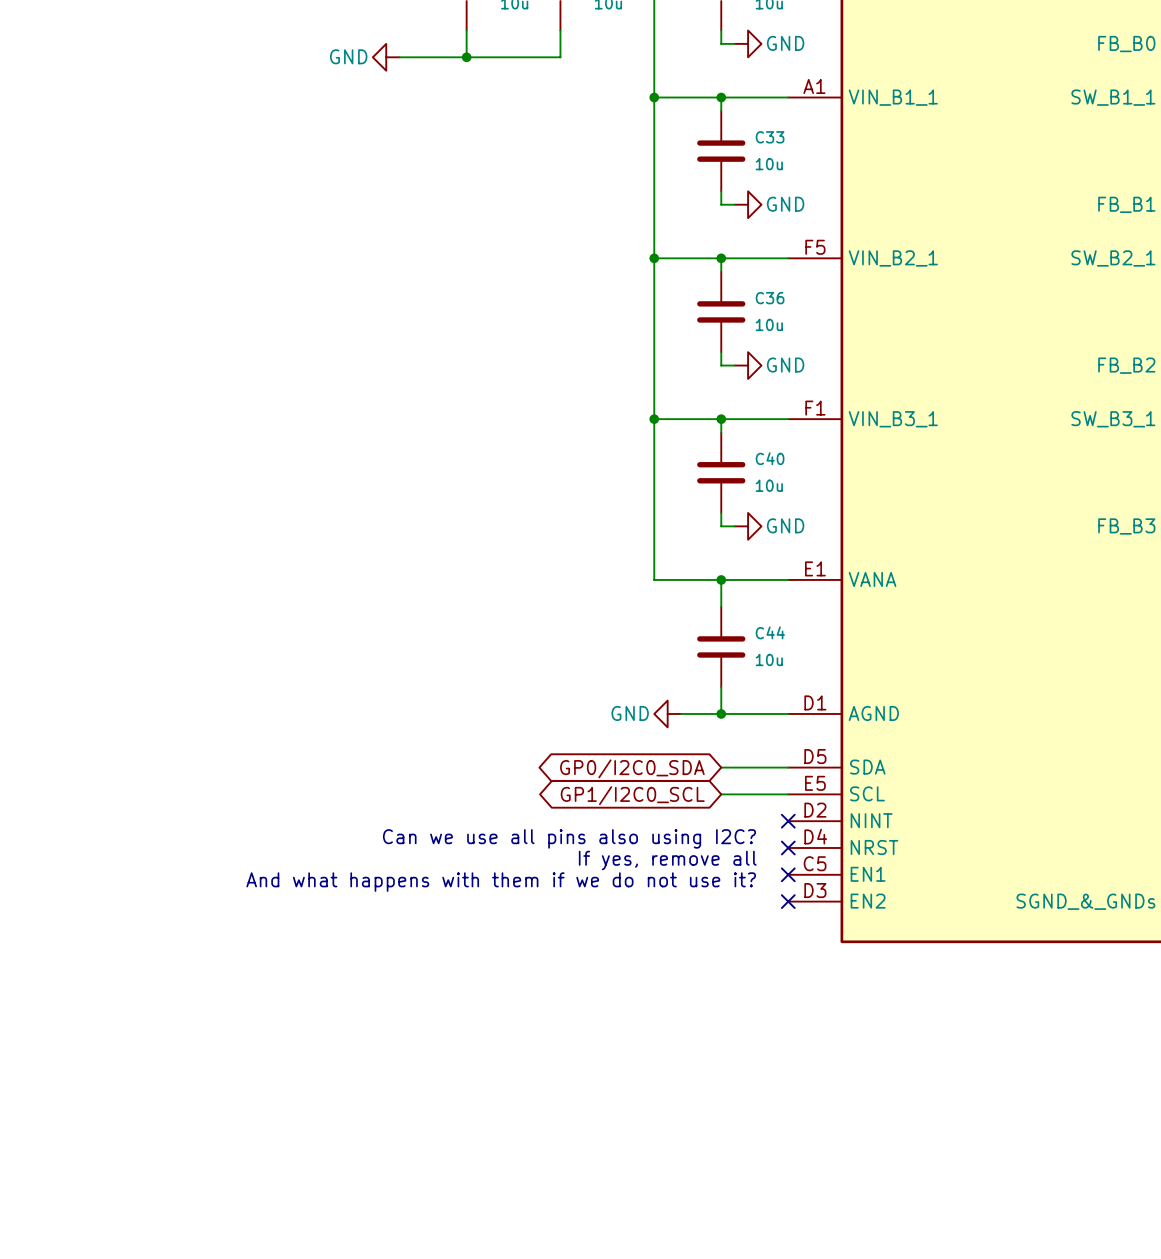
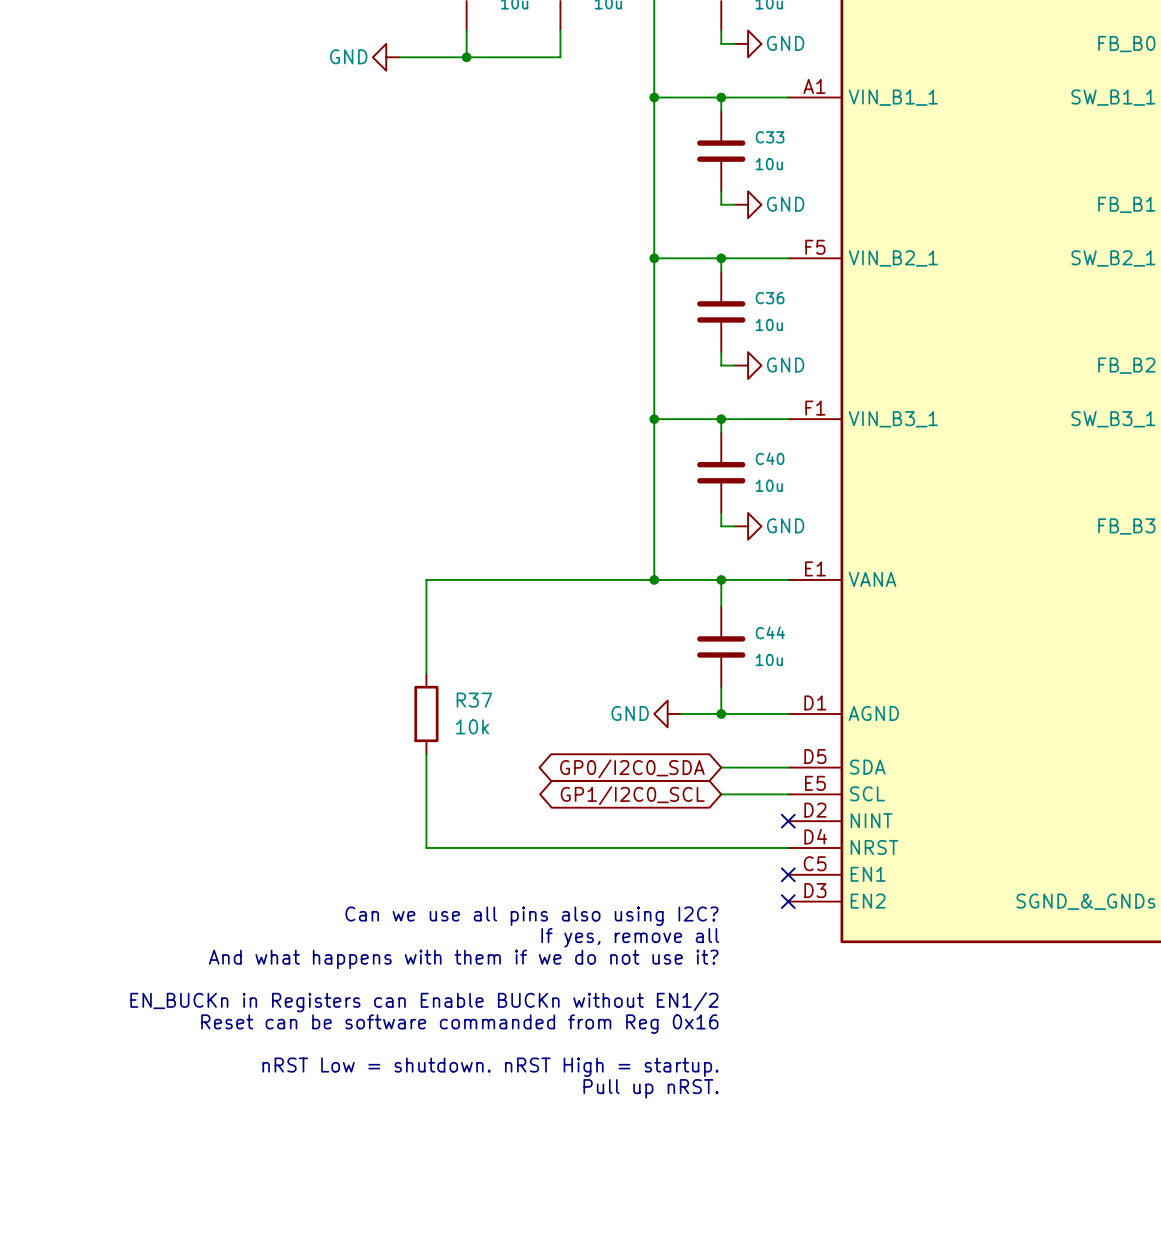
wire: none -> (654, 579) (426, 579) (426, 673)
junction: none -> (654, 579)
R37: none -> 10k (426, 713)
wire: none -> (426, 754) (426, 847) (788, 847)
text position: Can we use all pins also using I2C? (569, 838) -> Can we use all pins also using I2C? (531, 916)
no-connect mark: (788, 847) -> none
text position: If yes, remove all (667, 860) -> If yes, remove all (630, 937)
text position: And what happens with them if we do not use it? (501, 882) -> And what happens with them if we do not use it? (463, 959)
text: none -> EN_BUCKn in Registers can Enable BUCKn without EN1/2 (424, 1002)
text: none -> Reset can be software commanded from Reg 0x16 (459, 1024)
text: none -> nRST Low = shutdown. nRST High = startup. (490, 1067)
text: none -> Pull up nRST. (650, 1088)

